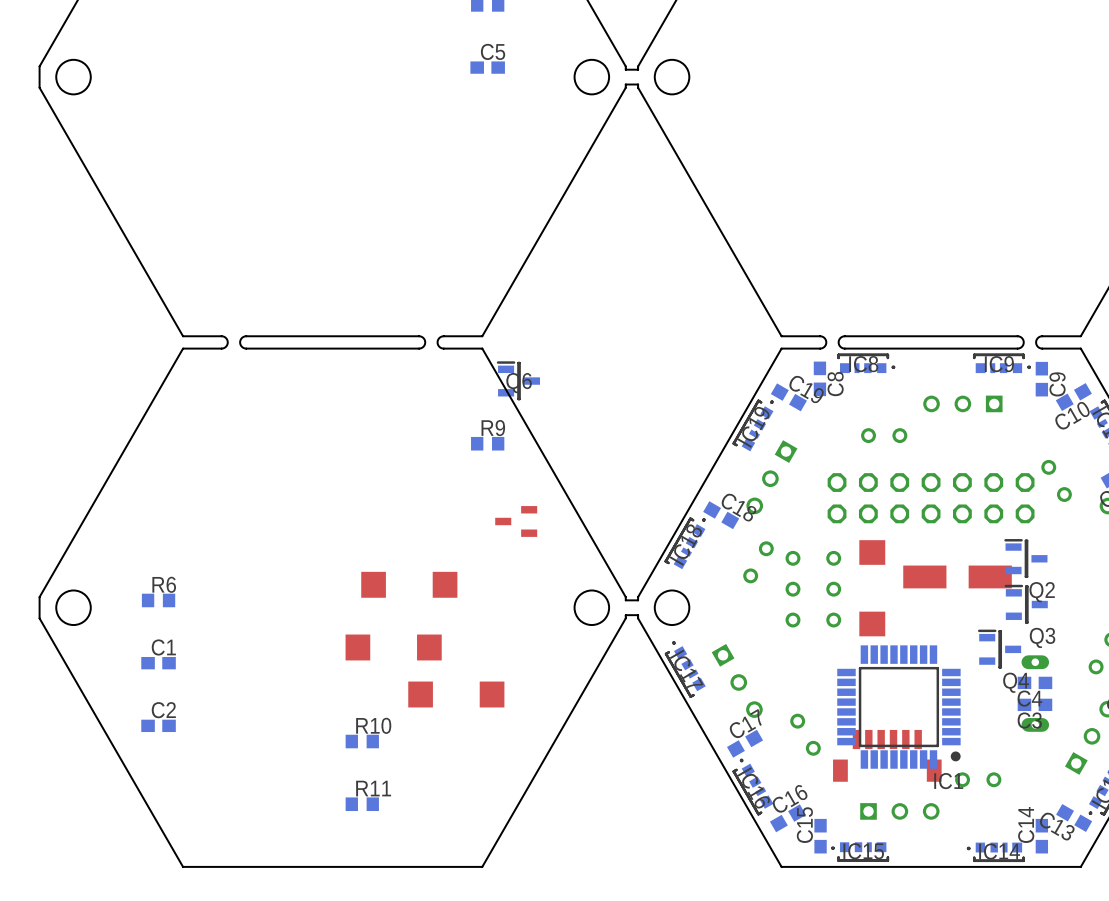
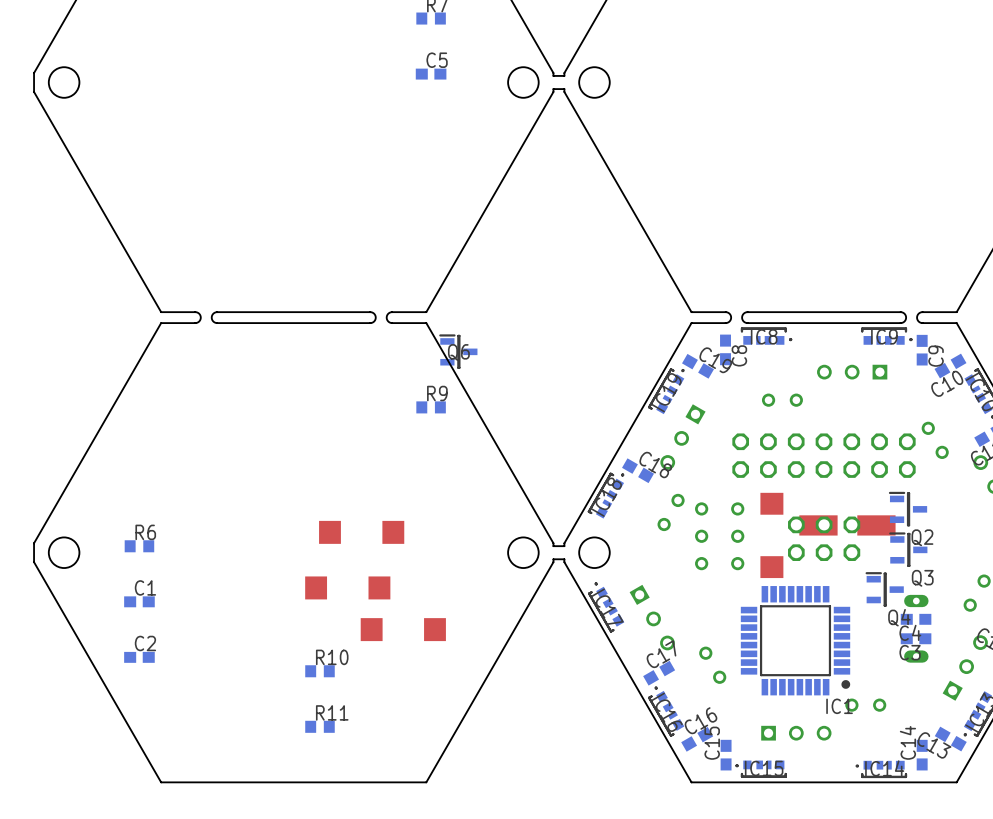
part: (516, 521) -> none
part: none -> (824, 538)
part: (887, 755) -> none

